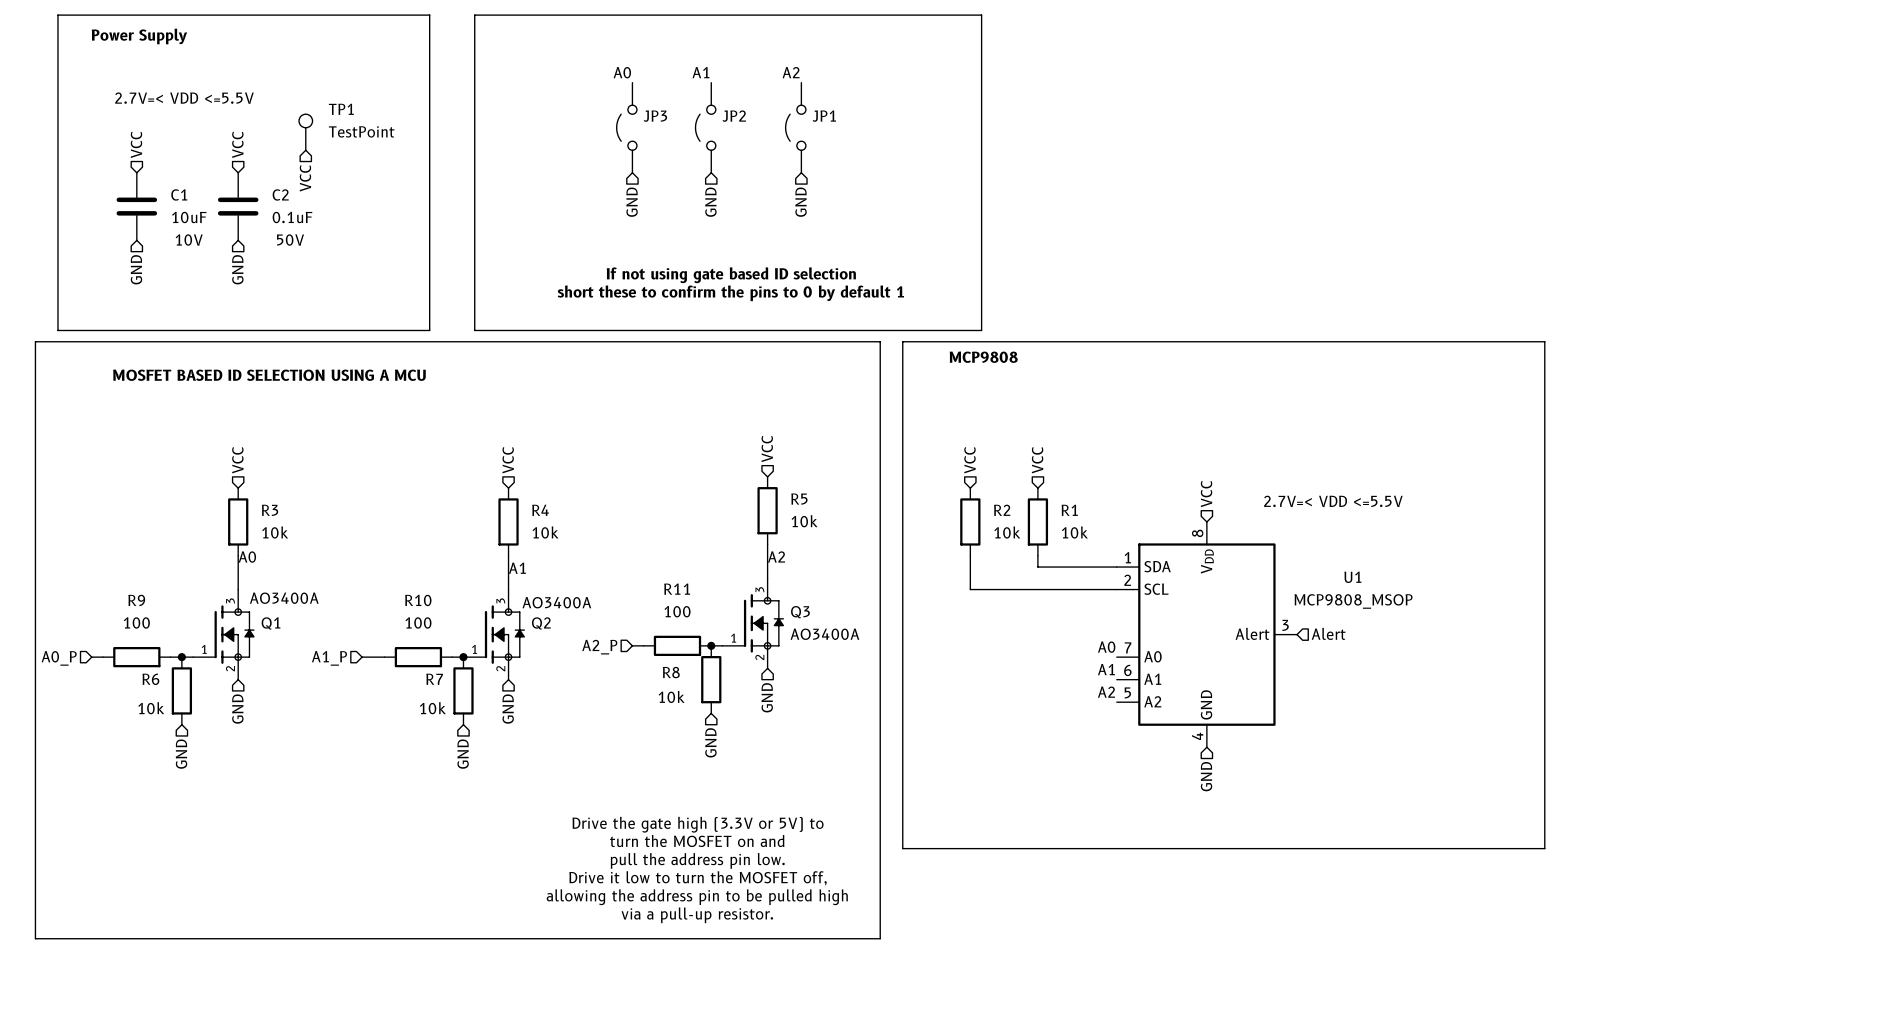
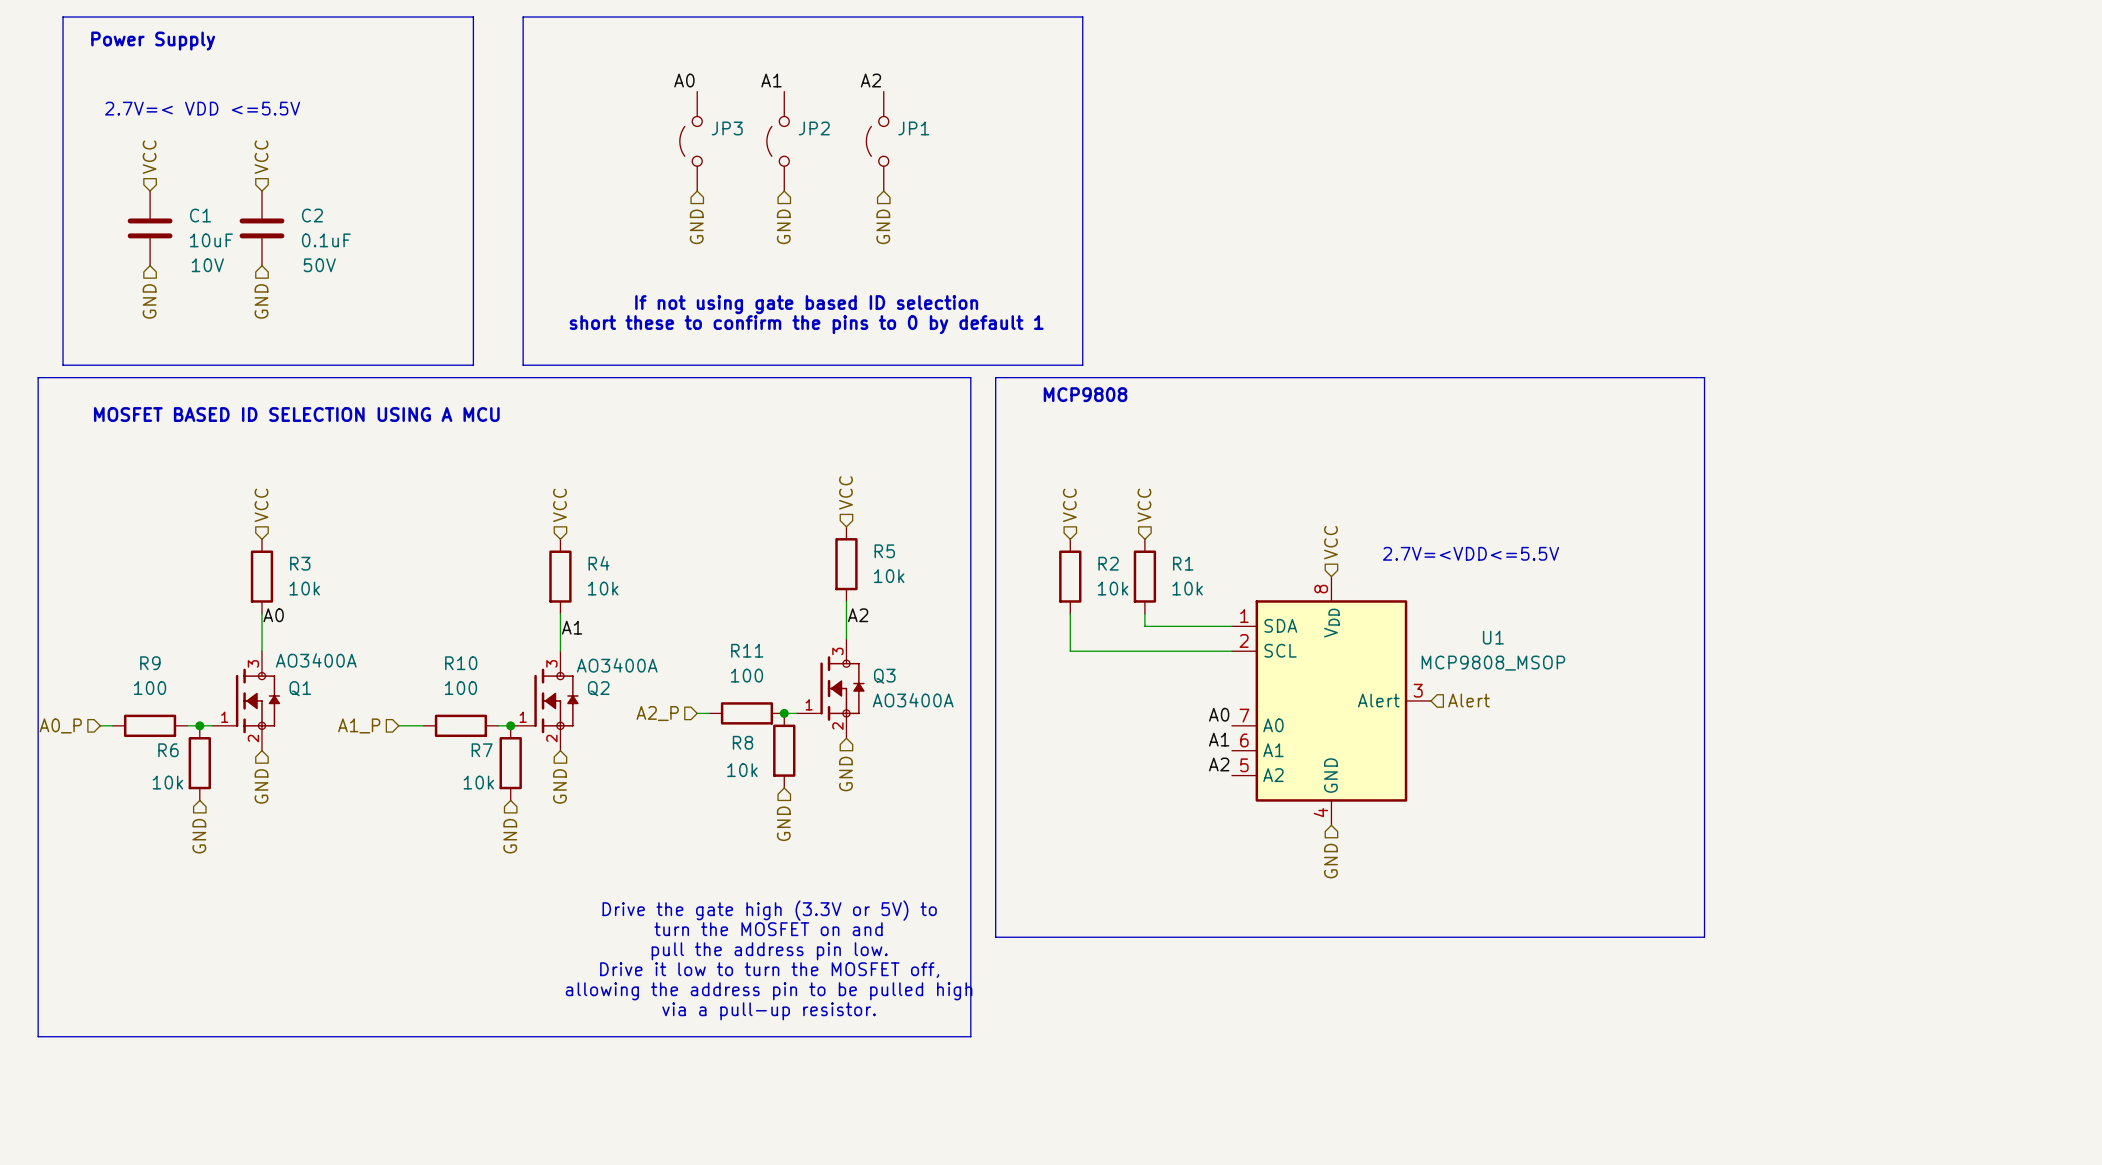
TP1: TestPoint (305, 132) -> none
hierarchical label: VCC (305, 178) -> none
text: 2.7V=< VDD <=5.5V (1333, 501) -> 2.7V=<VDD<=5.5V (1471, 553)

